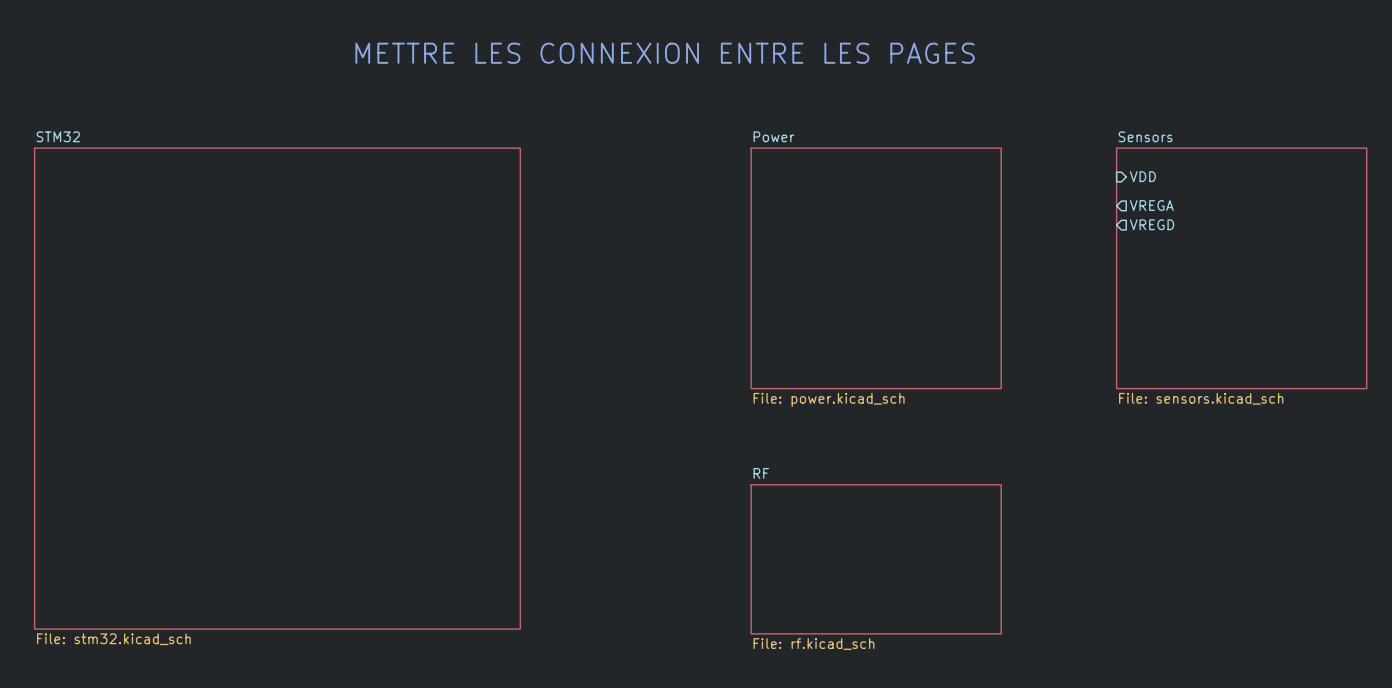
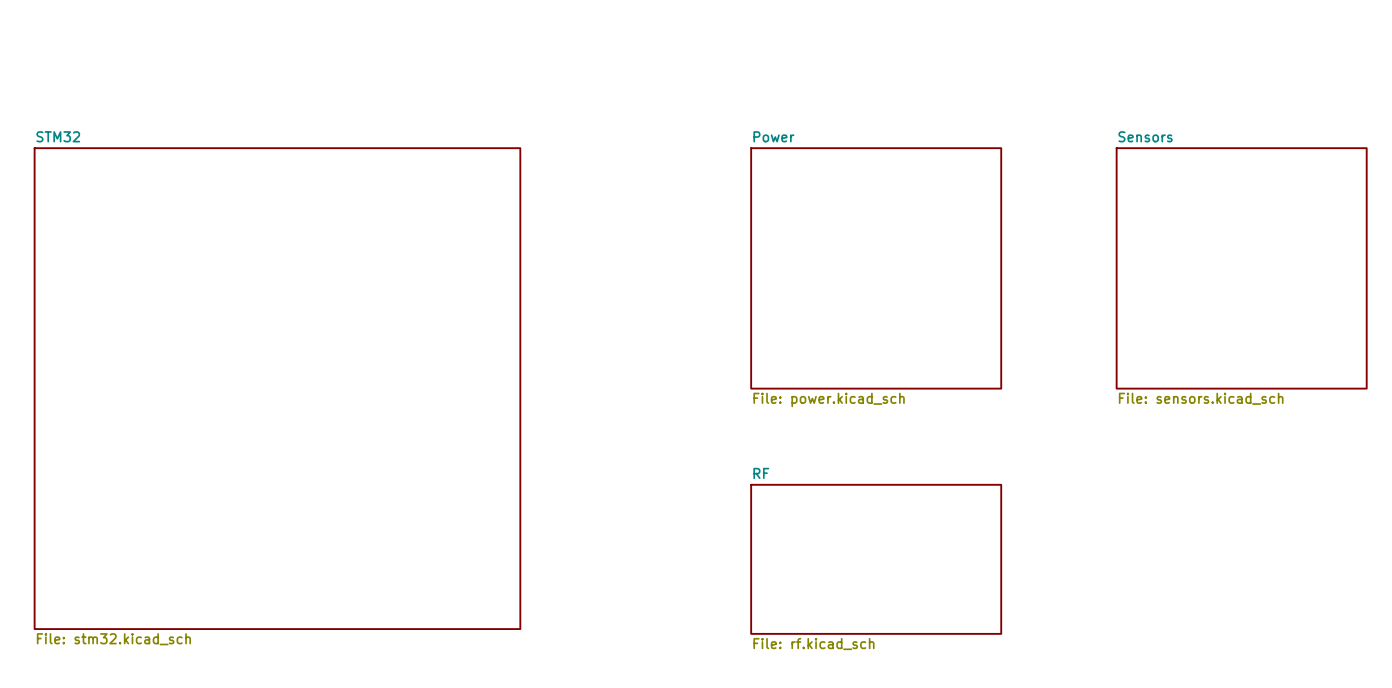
text: METTRE LES CONNEXION ENTRE LES PAGES (665, 53) -> none
sheet pin: VDD (1142, 176) -> none
sheet pin: VREGA (1151, 205) -> none
sheet pin: VREGD (1152, 224) -> none

